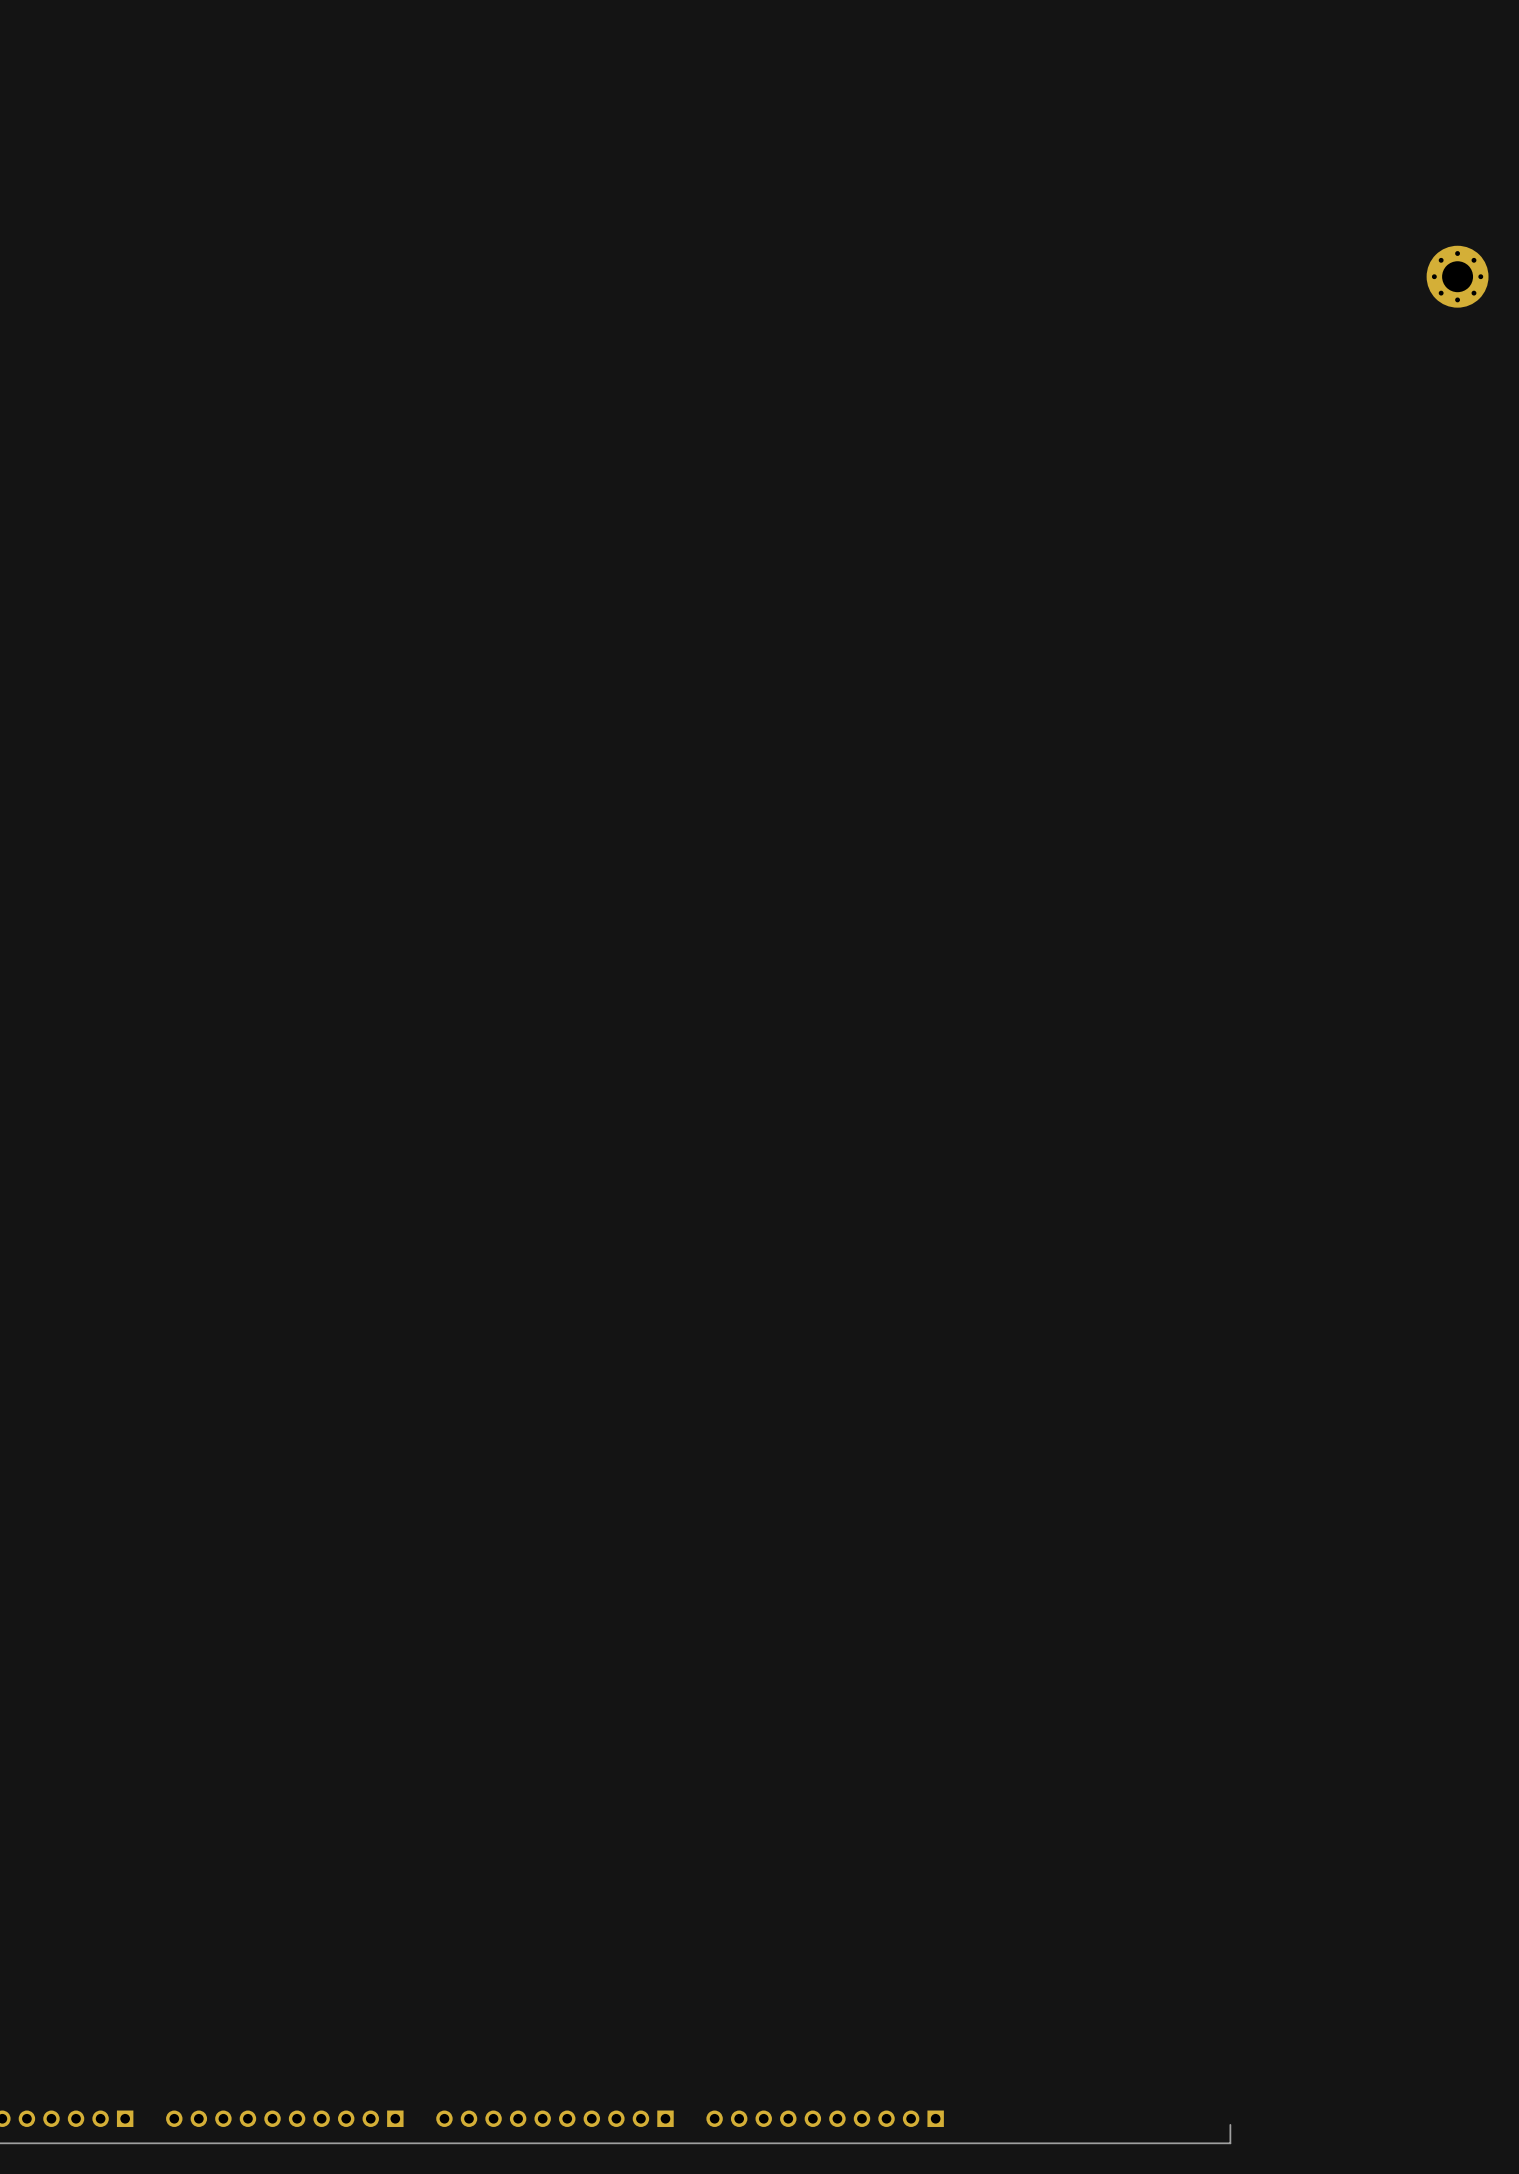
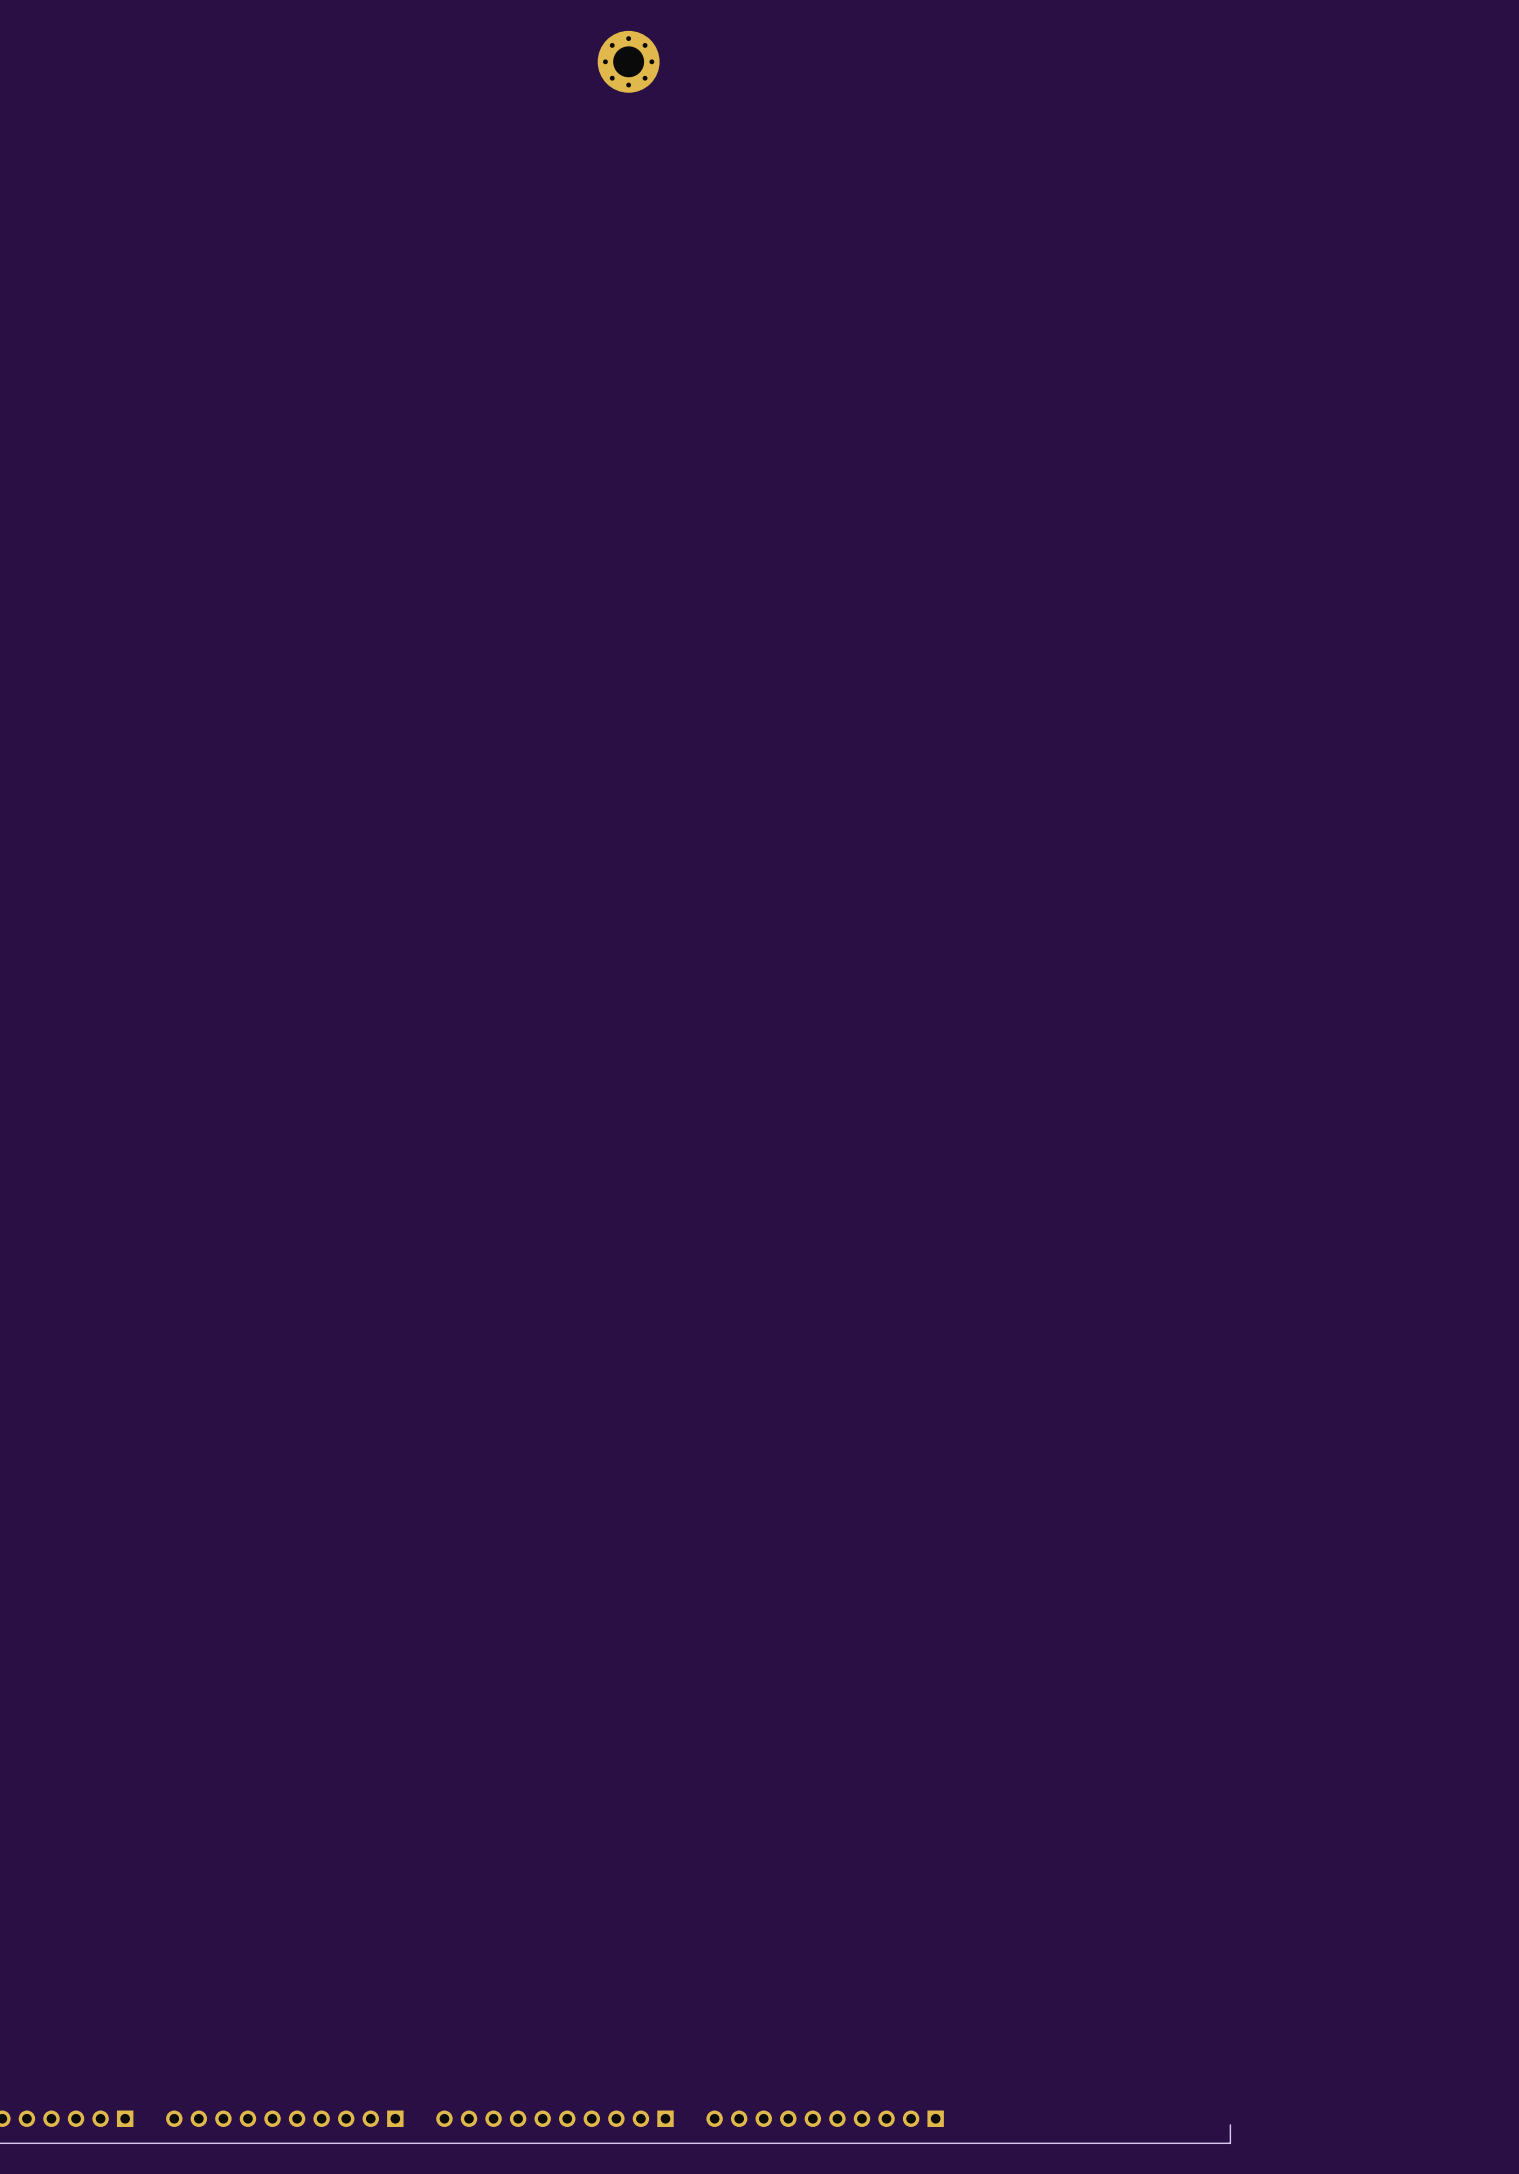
part: none -> (628, 61)
part: (1457, 276) -> none

